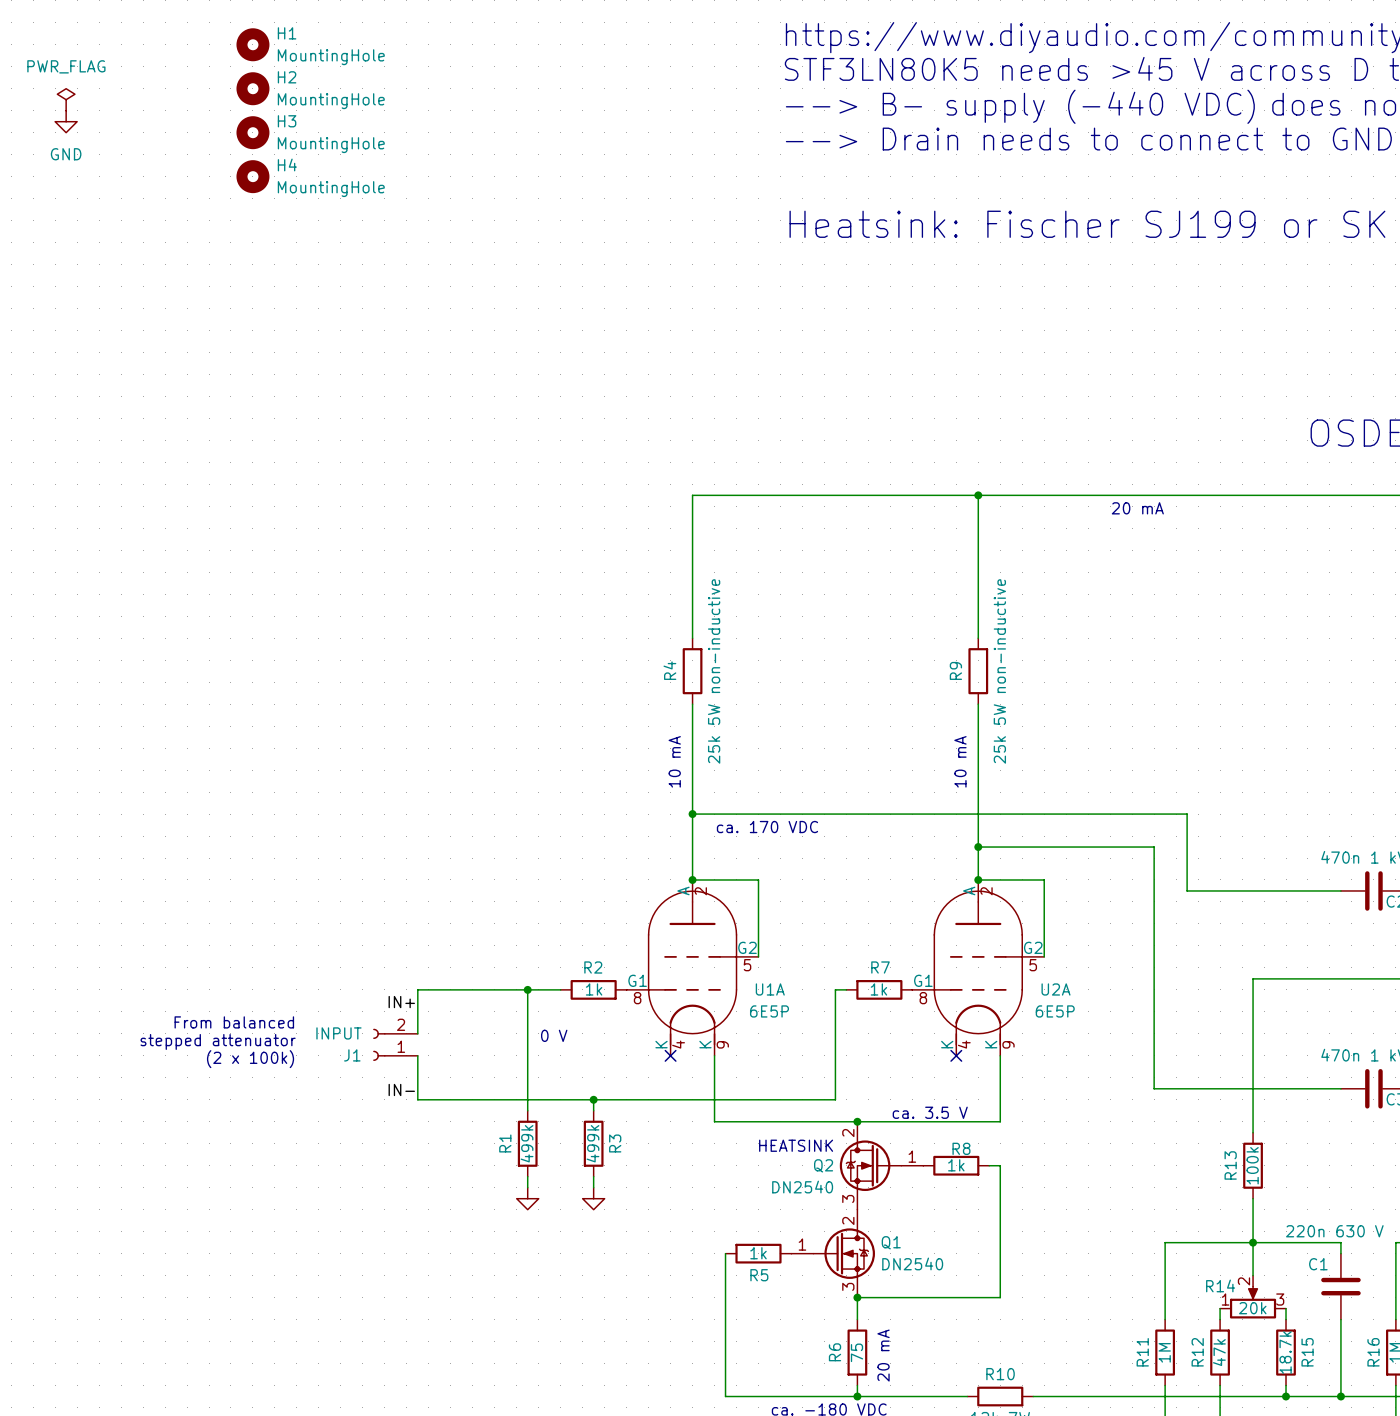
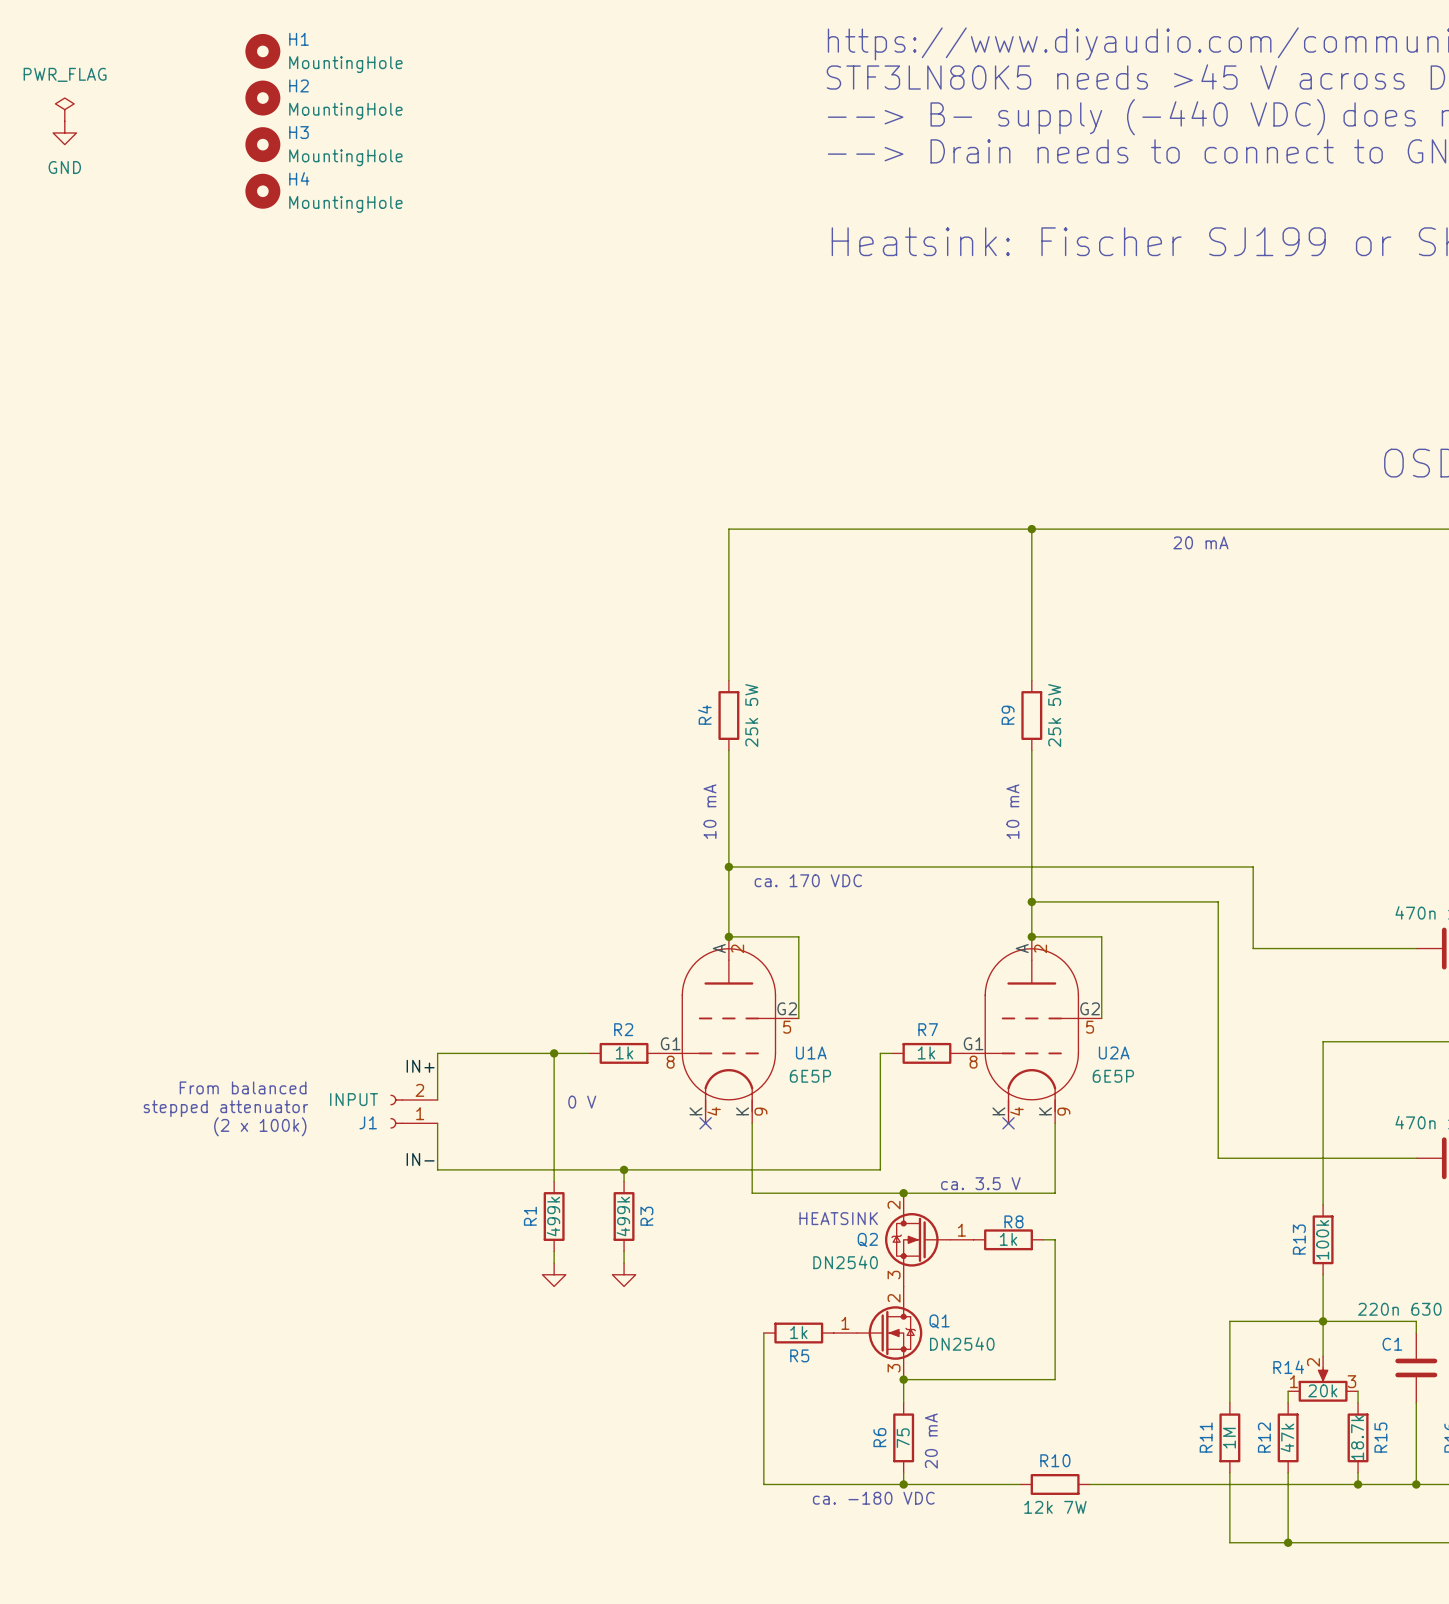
R4 value: 25k 5W non-inductive (714, 671) -> 25k 5W (751, 715)
R9 value: 25k 5W non-inductive (999, 671) -> 25k 5W (1054, 715)

